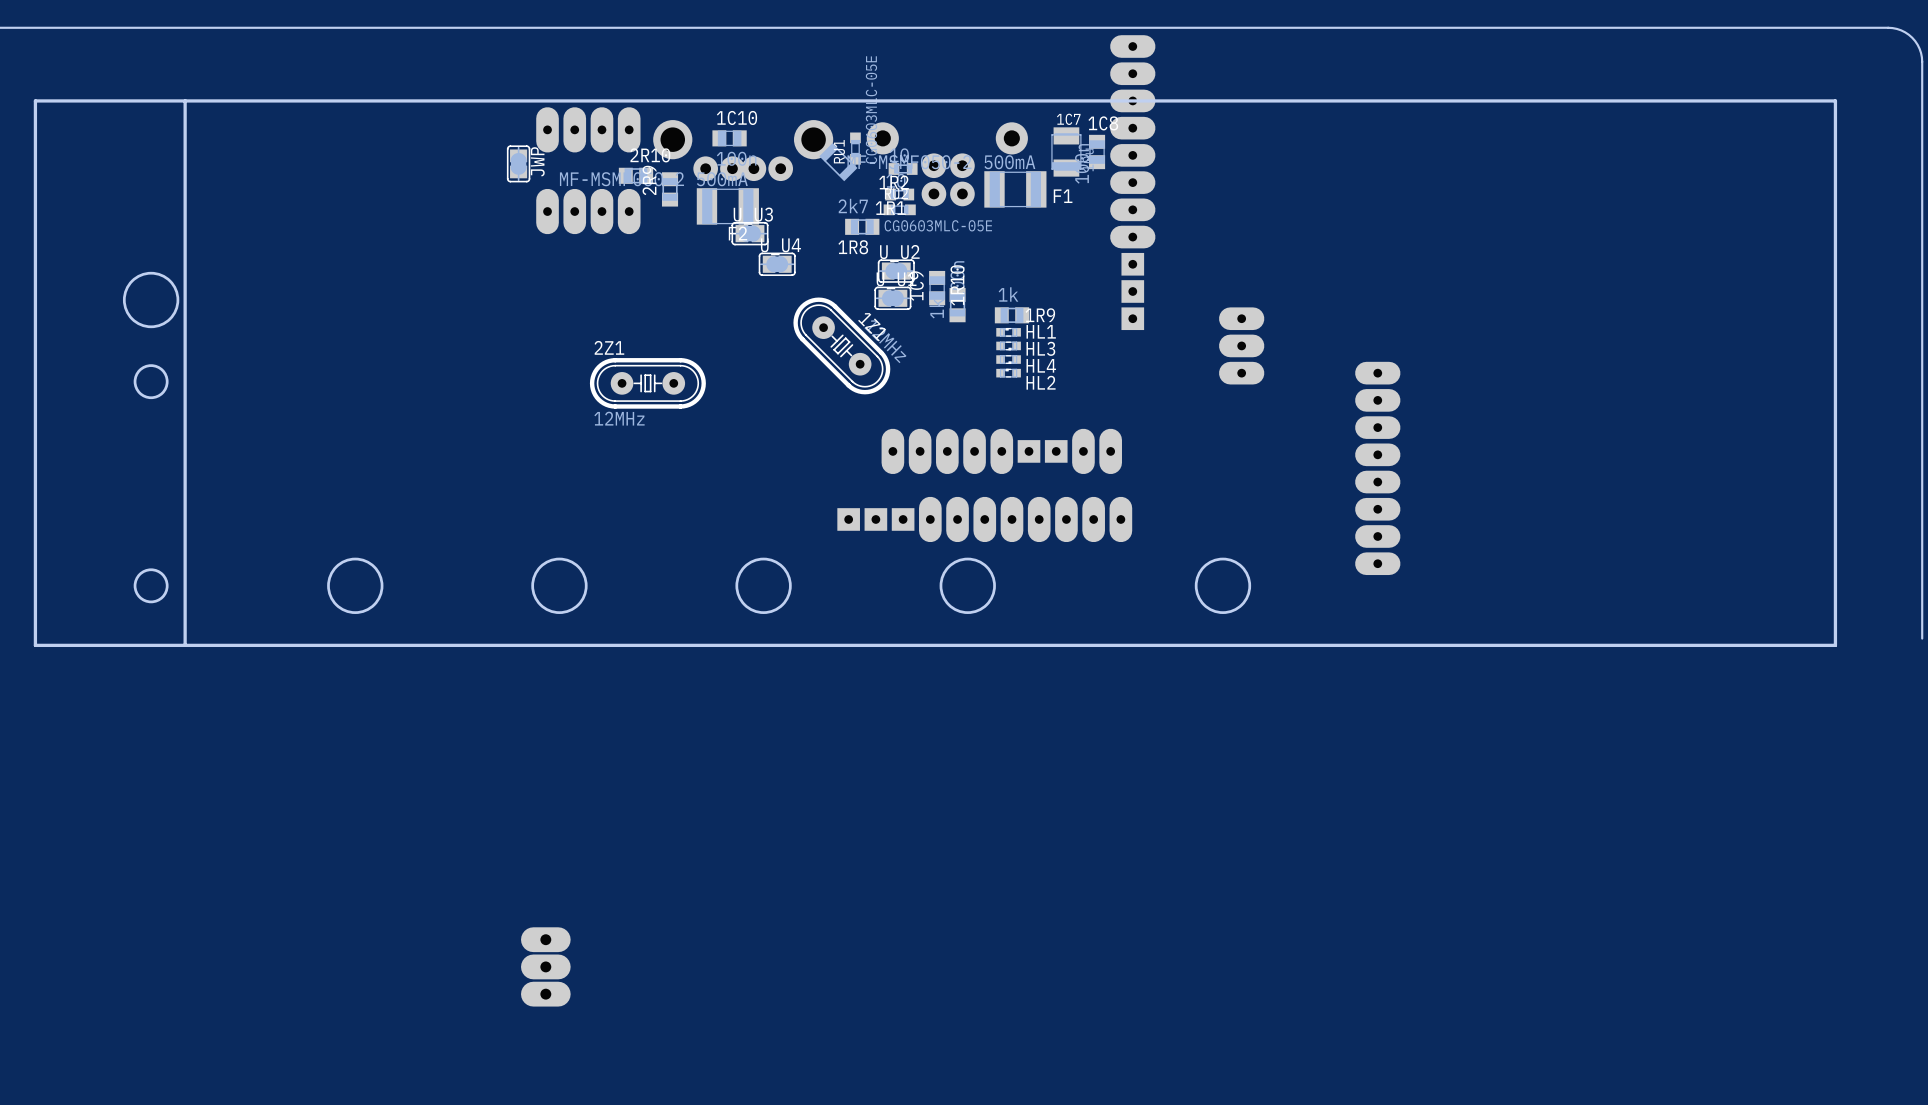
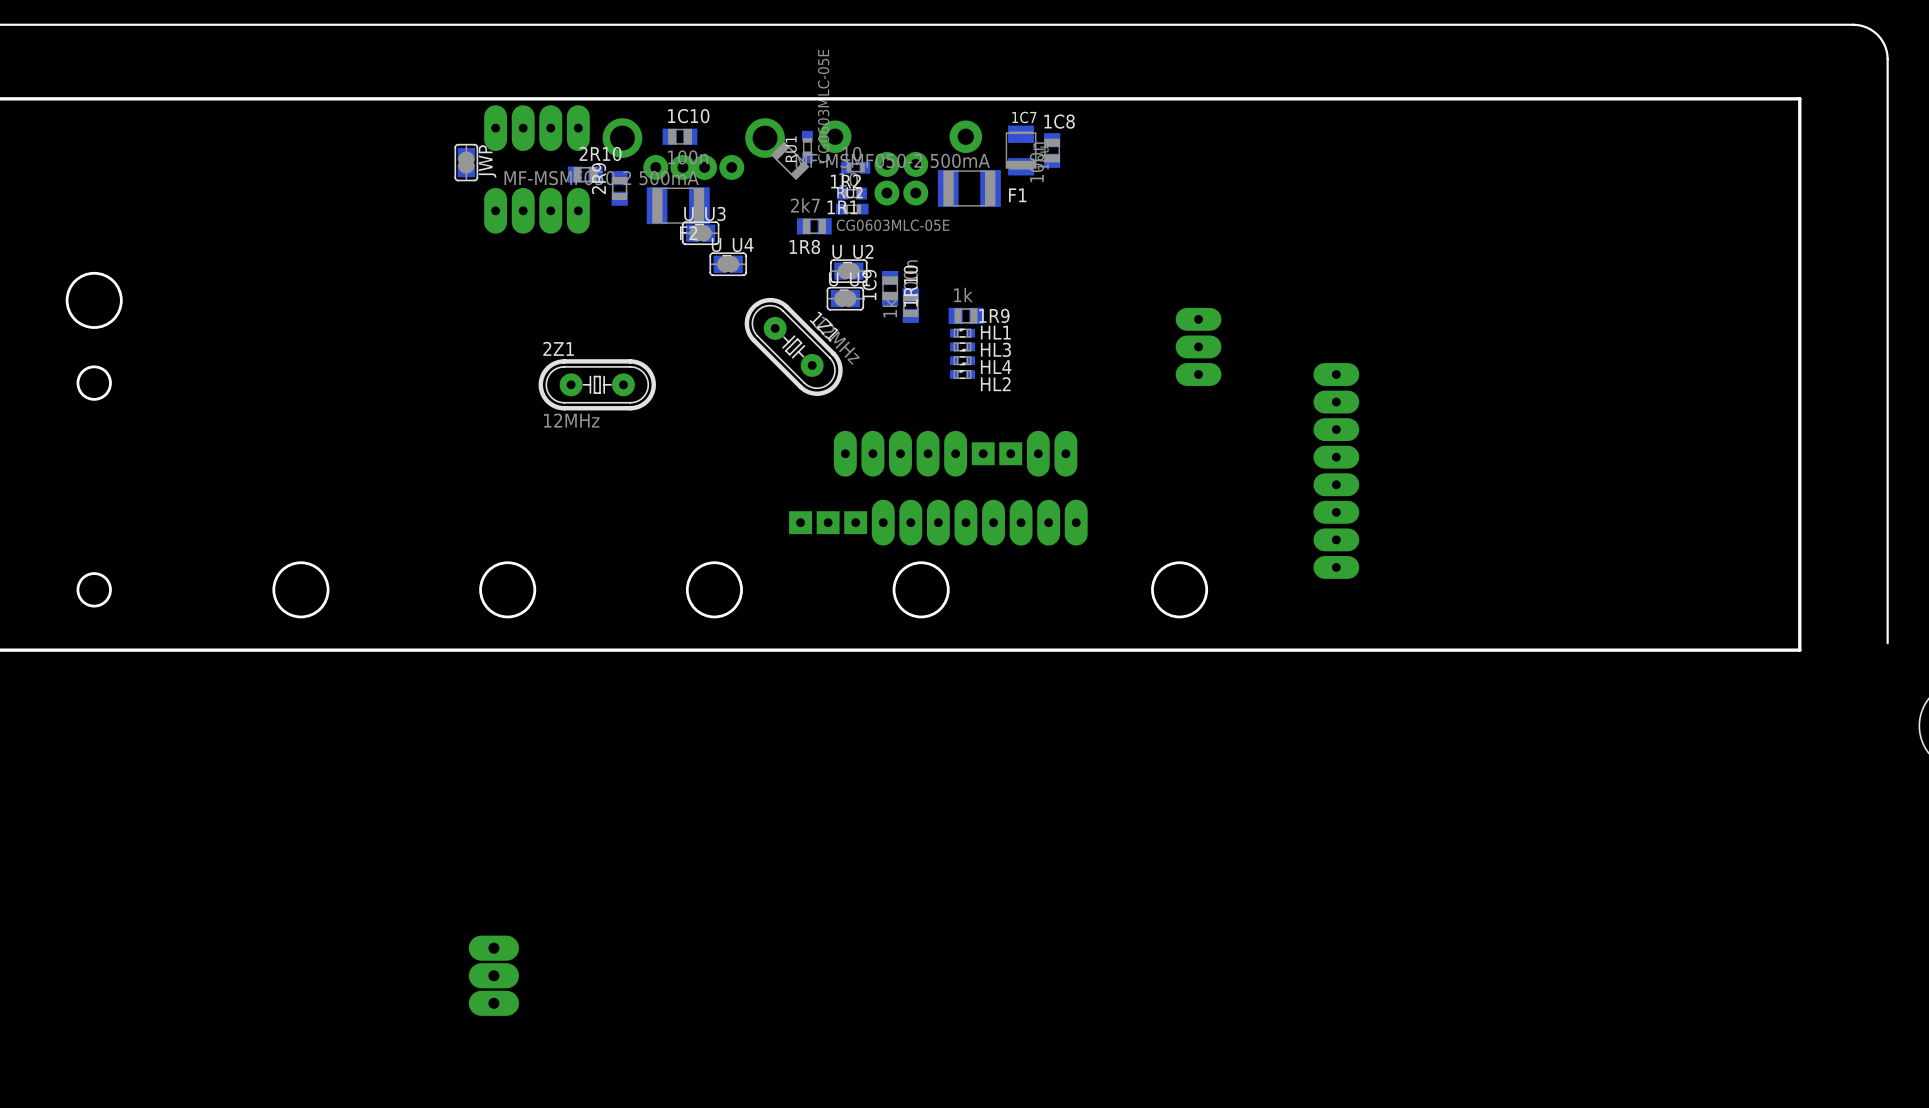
board edge: (185, 100) (185, 645) -> none
part: (1132, 182) -> none

